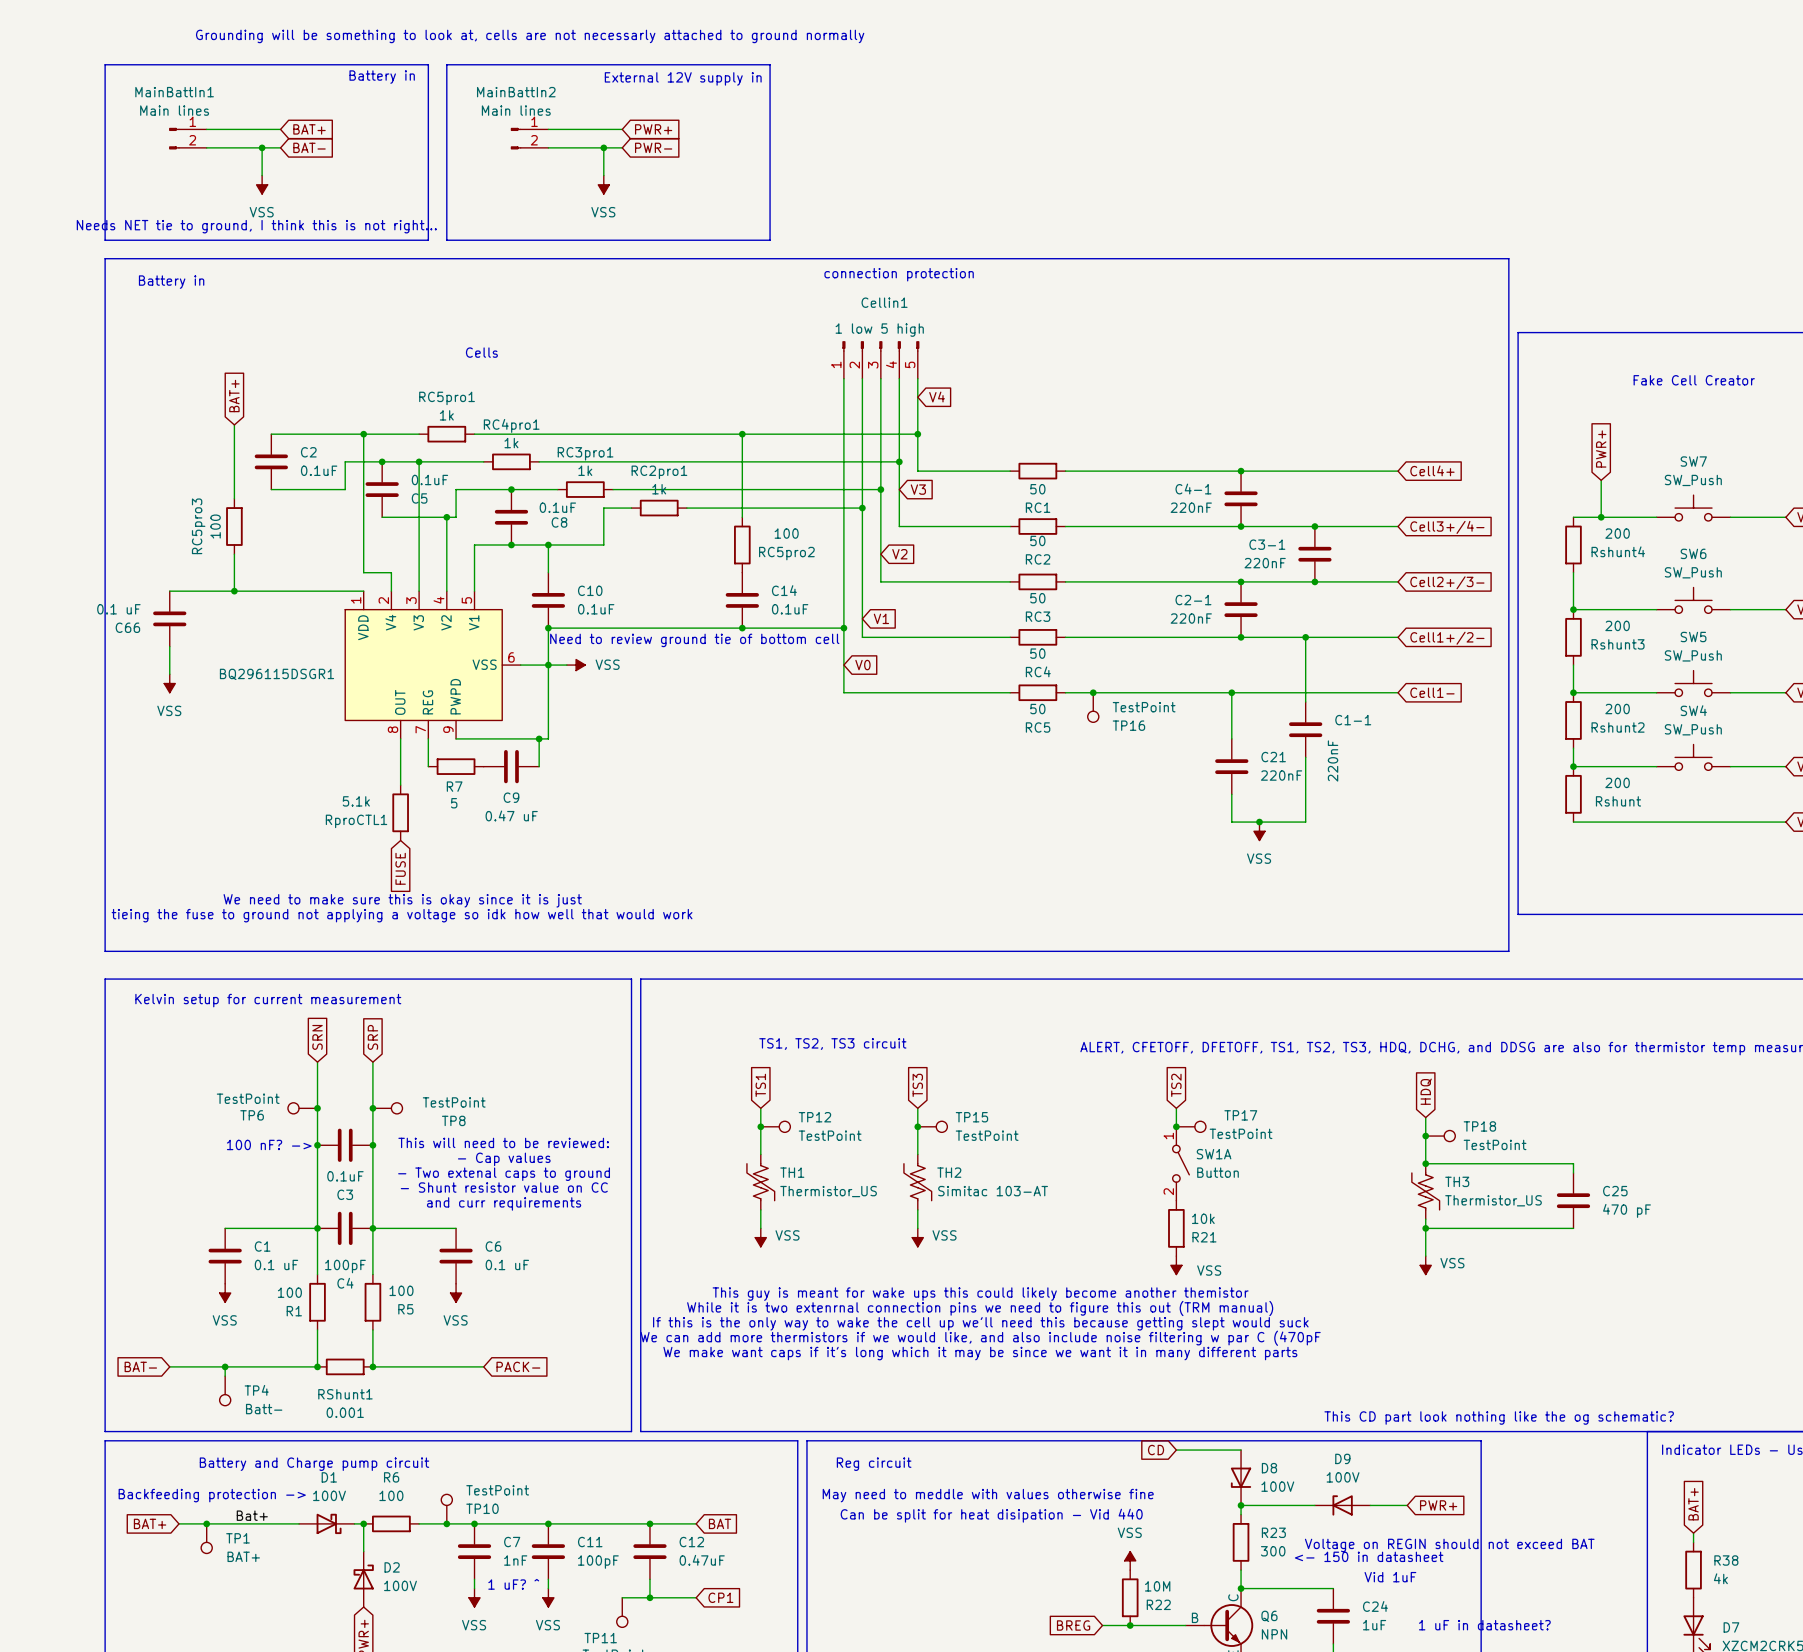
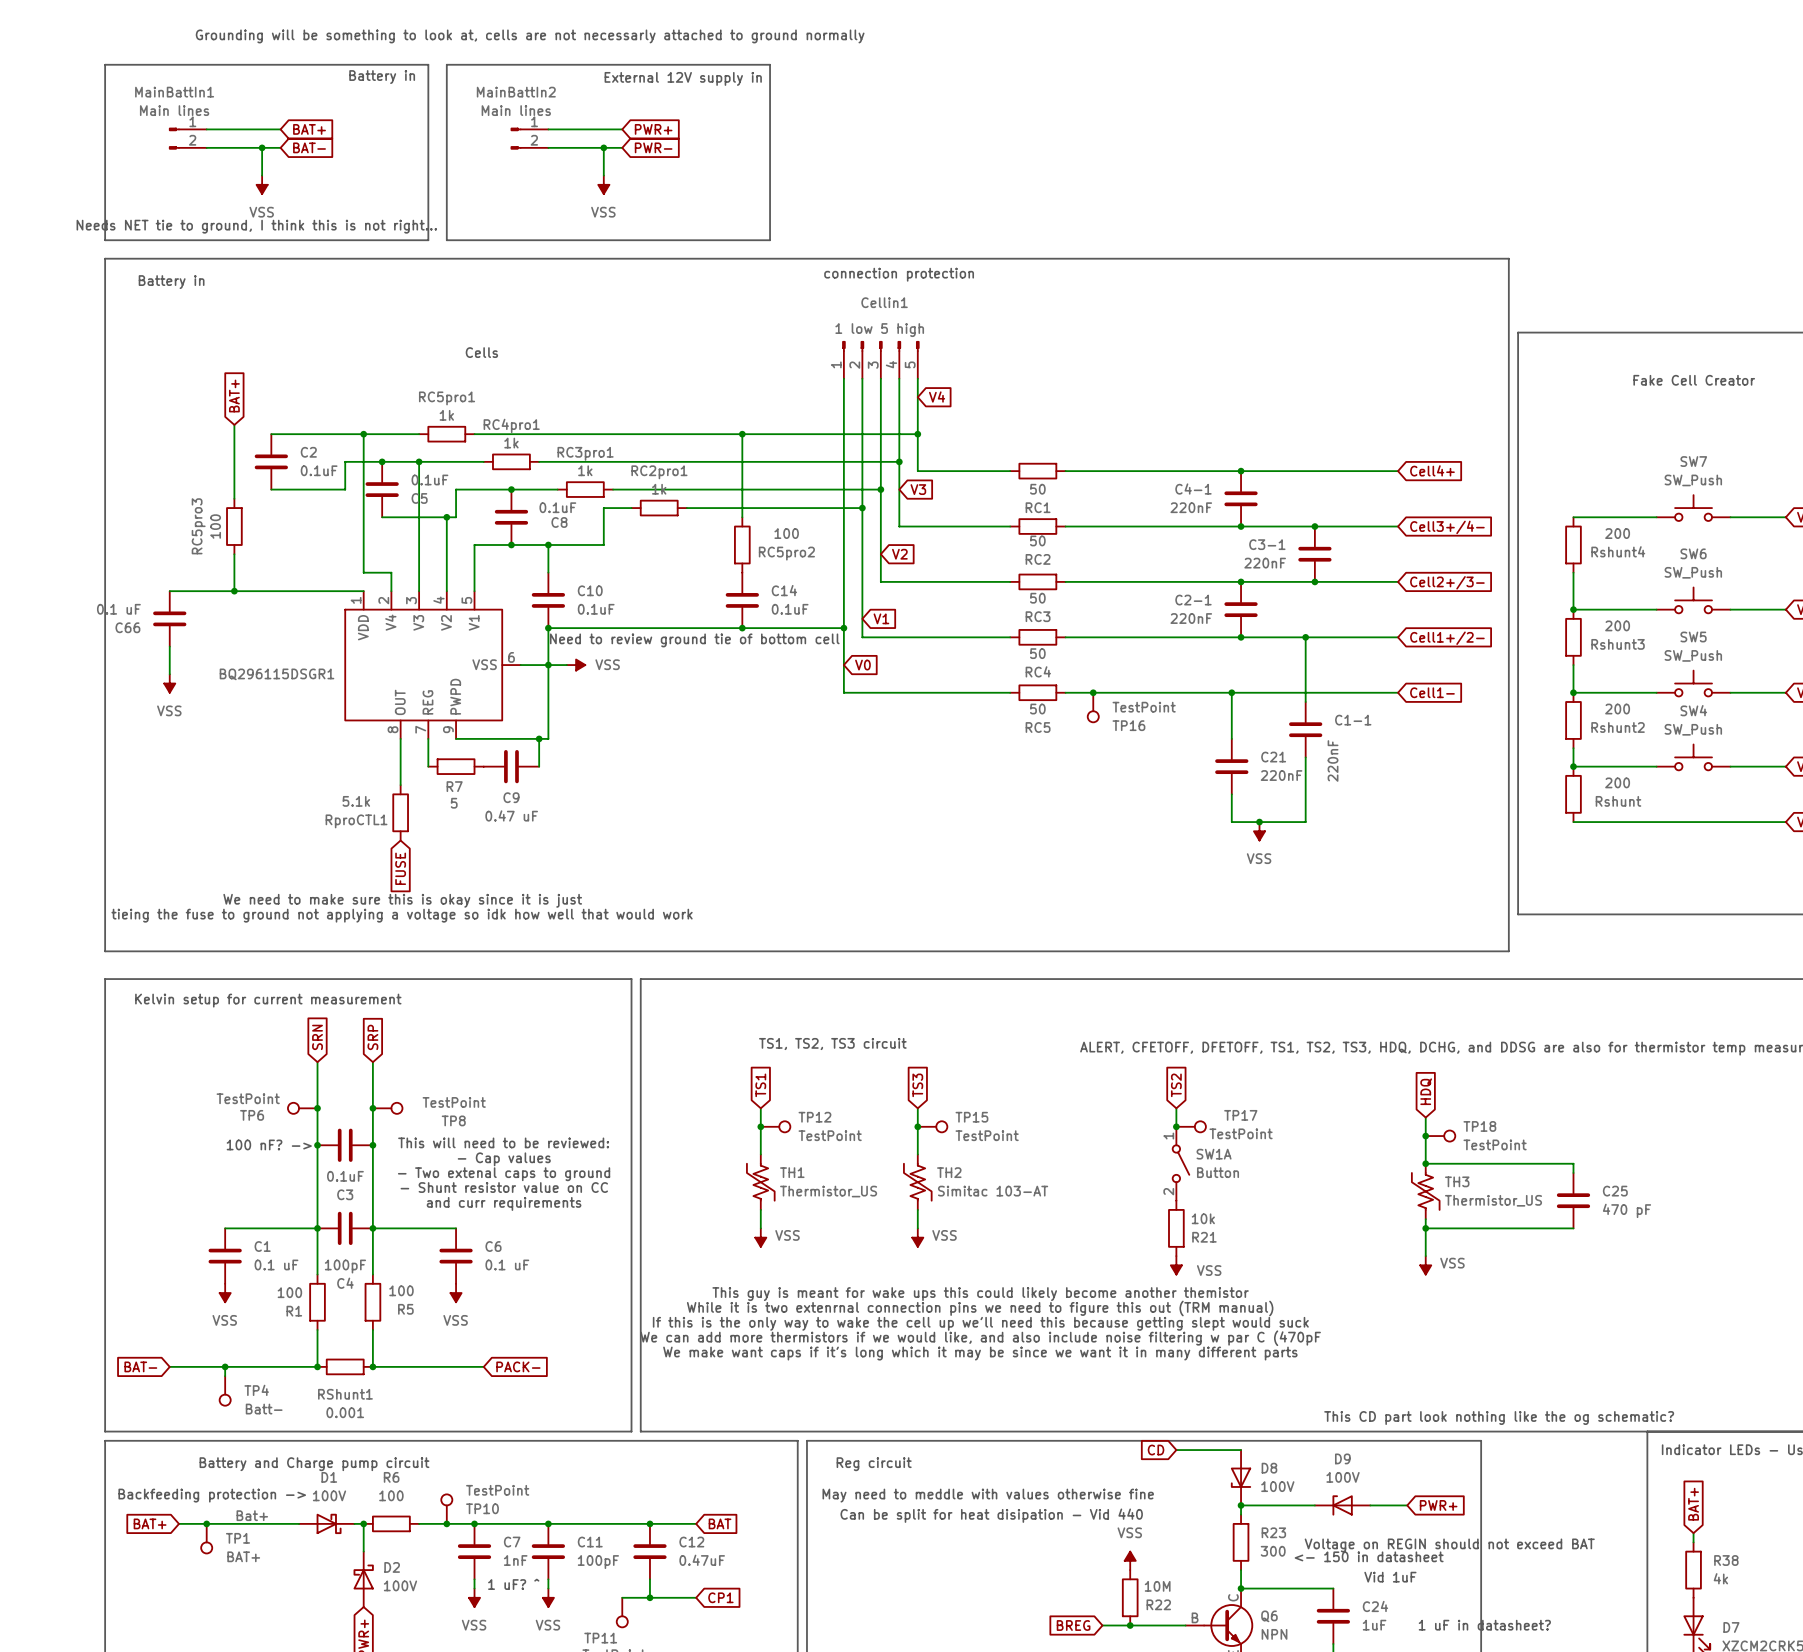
global label: PWR+ (1601, 449) -> none
wire: (1601, 480) (1601, 517) -> none
junction: (1601, 517) -> none

